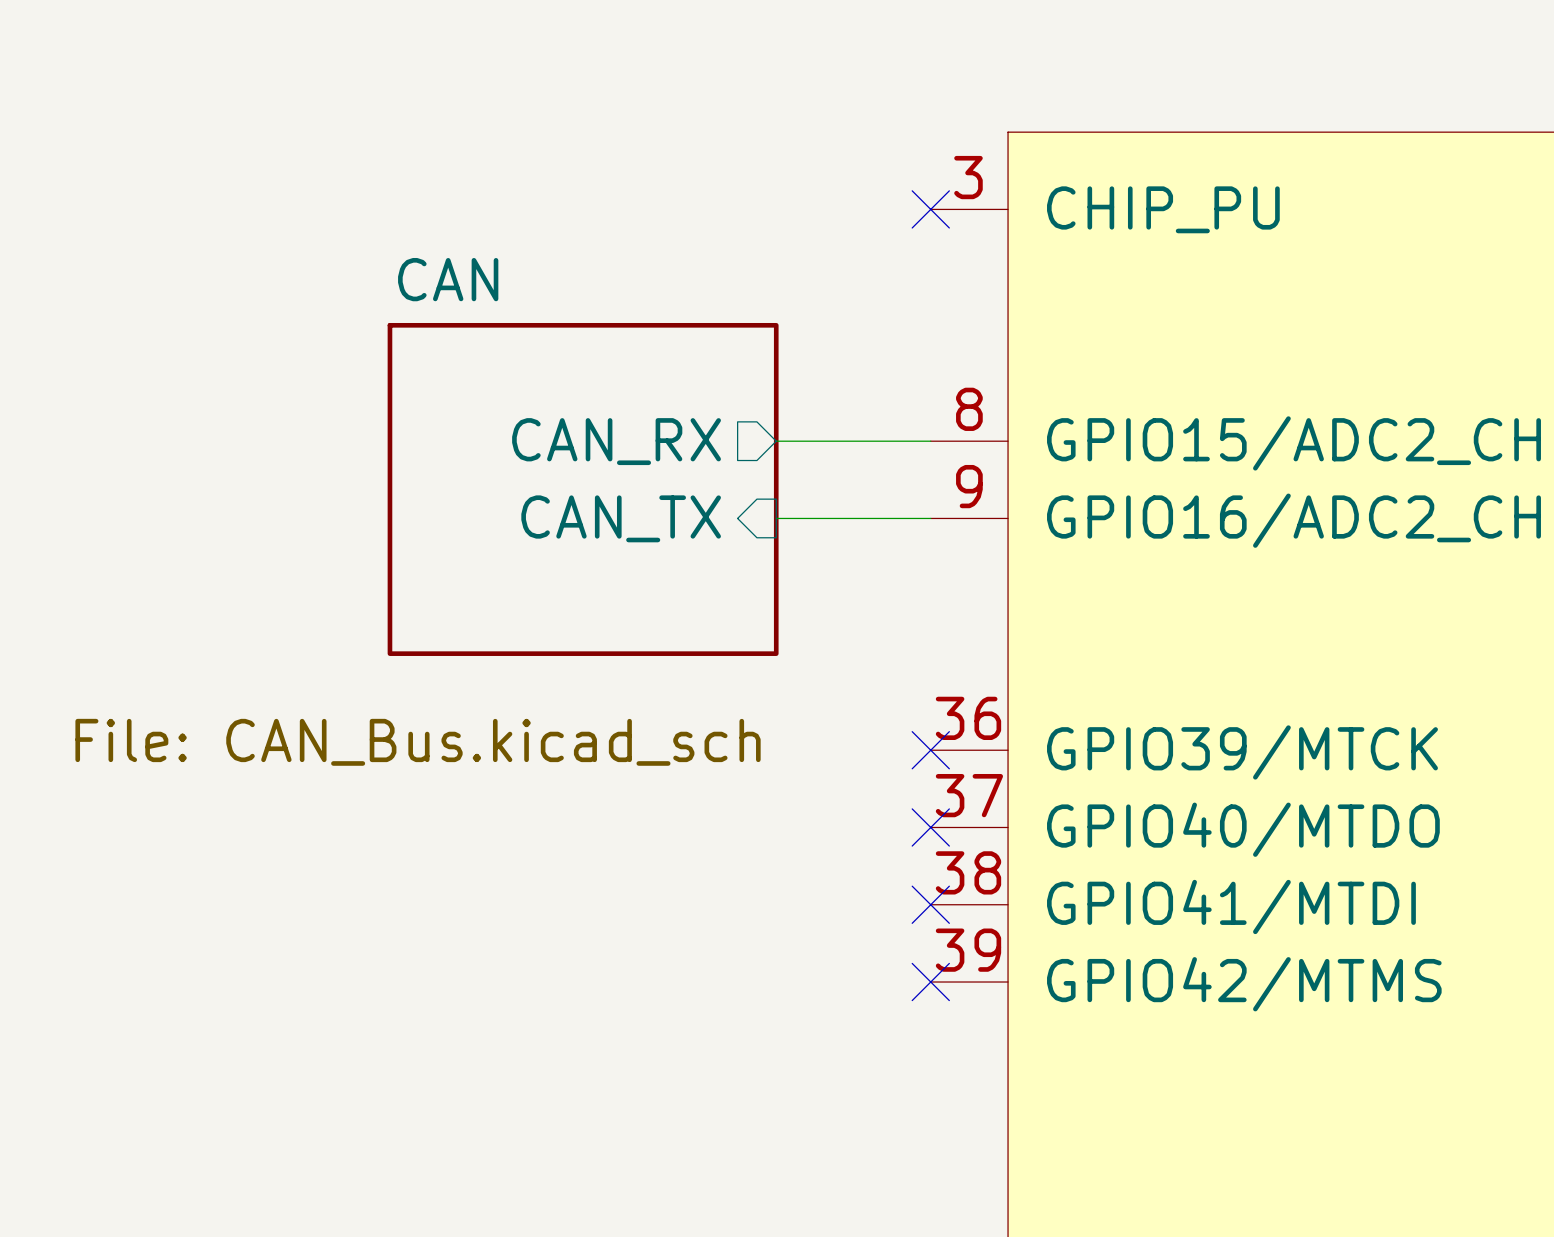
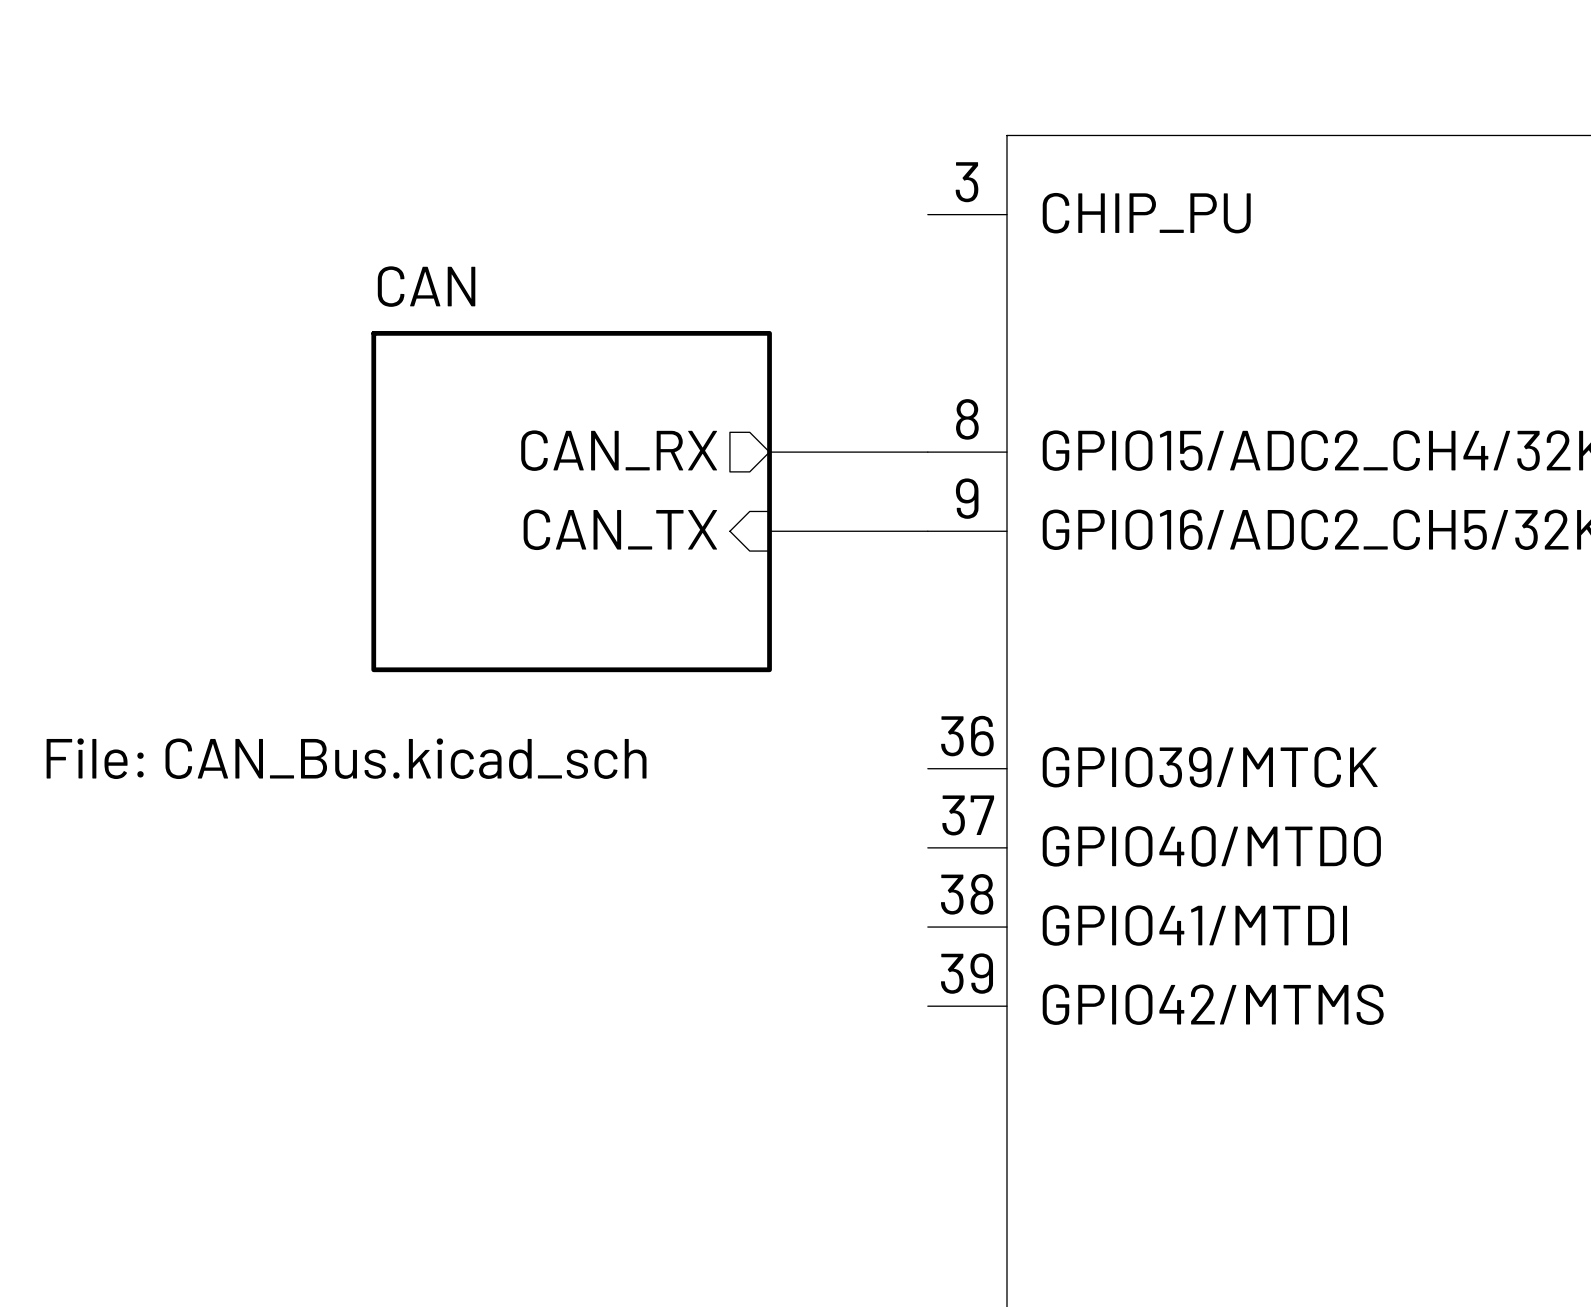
no-connect mark: (930, 209) -> none
no-connect mark: (930, 750) -> none
no-connect mark: (930, 827) -> none
no-connect mark: (930, 904) -> none
no-connect mark: (930, 982) -> none

